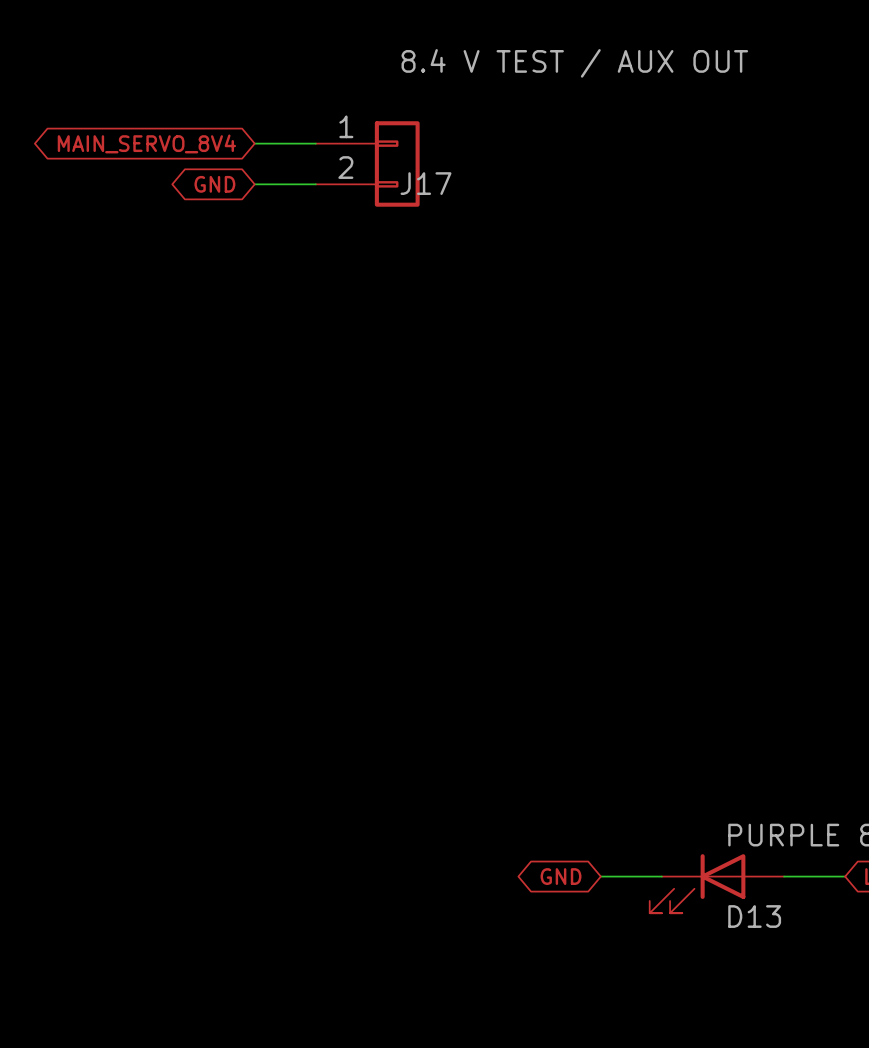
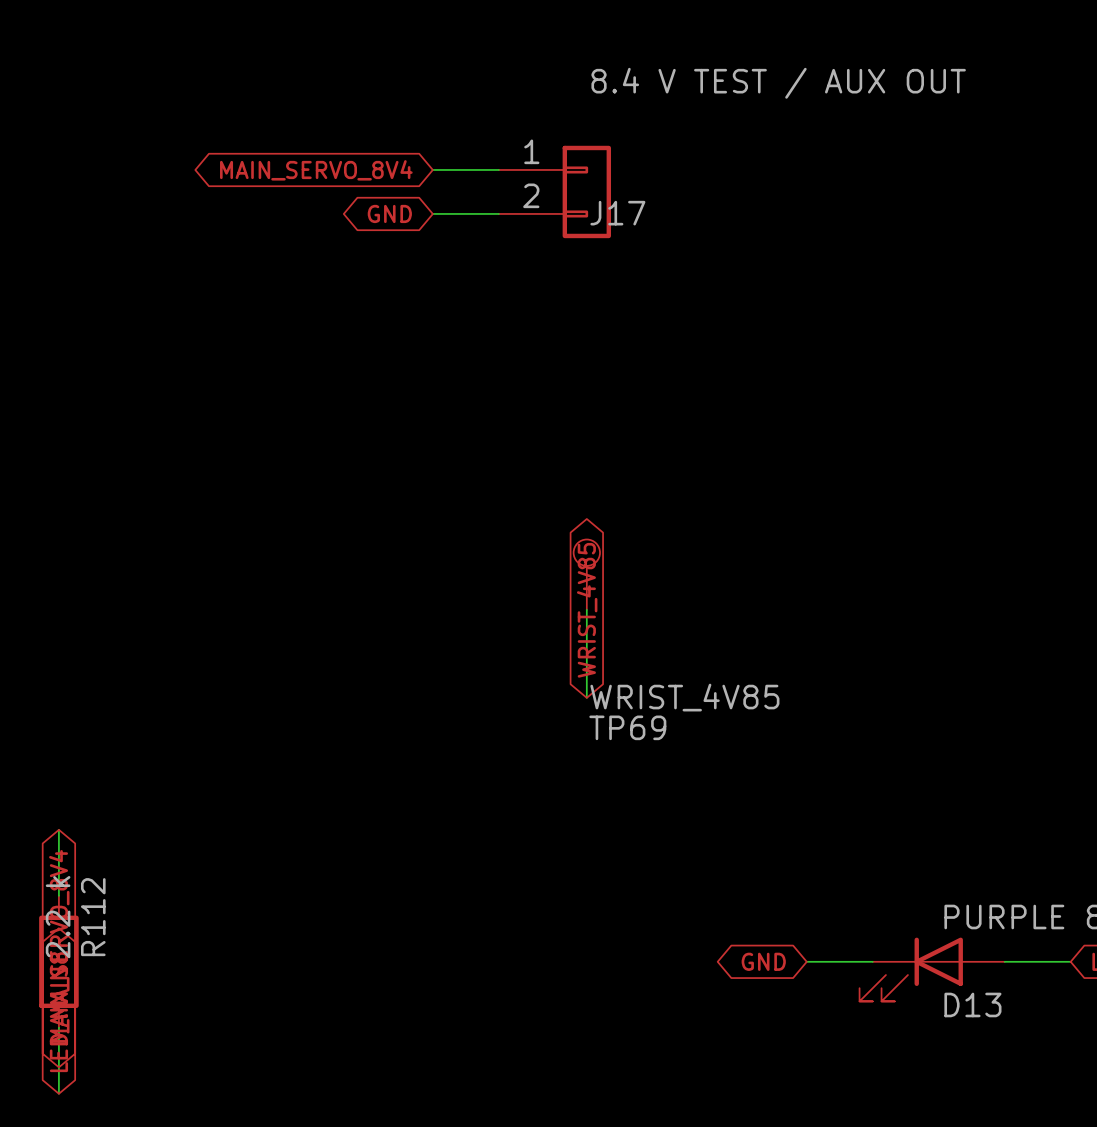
TP69: none -> WRIST_4V85 (586, 574)
wire: none -> (586, 609) (586, 697)
global label: none -> WRIST_4V85 (587, 610)

